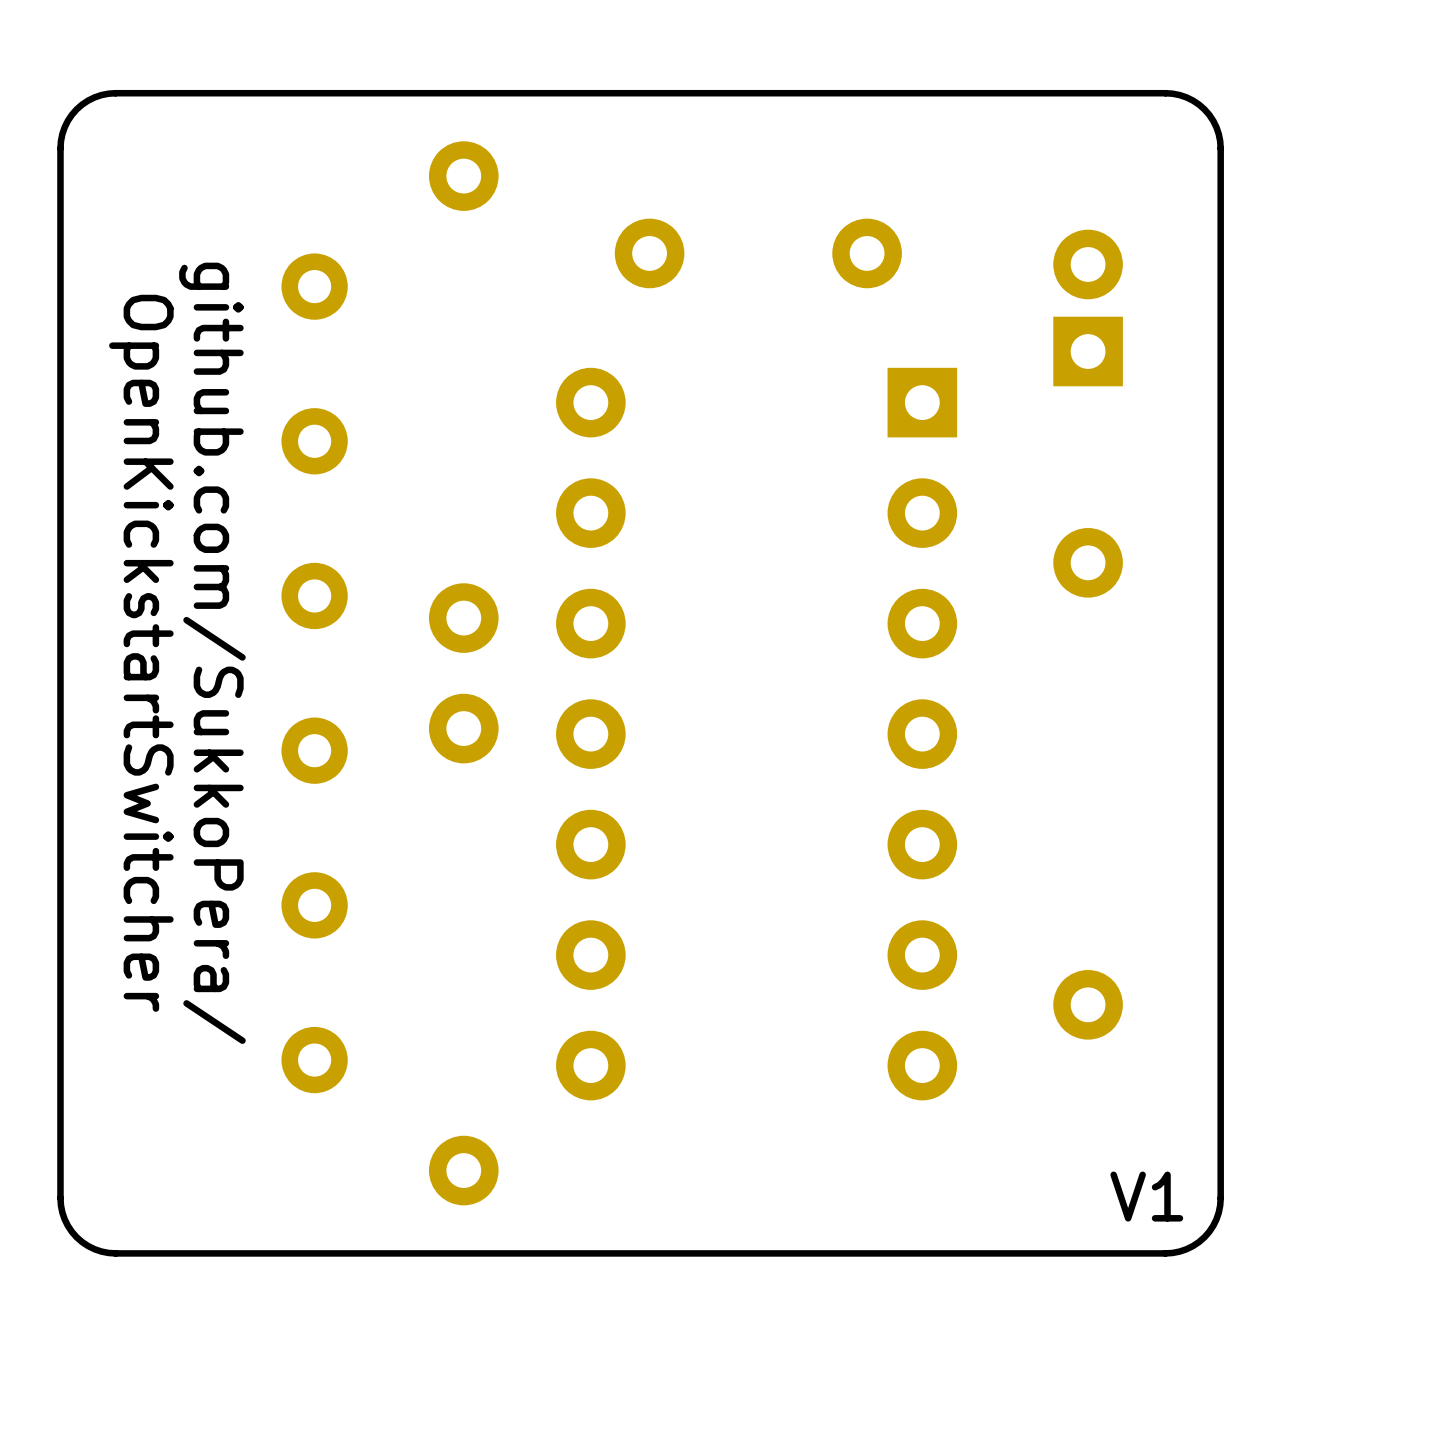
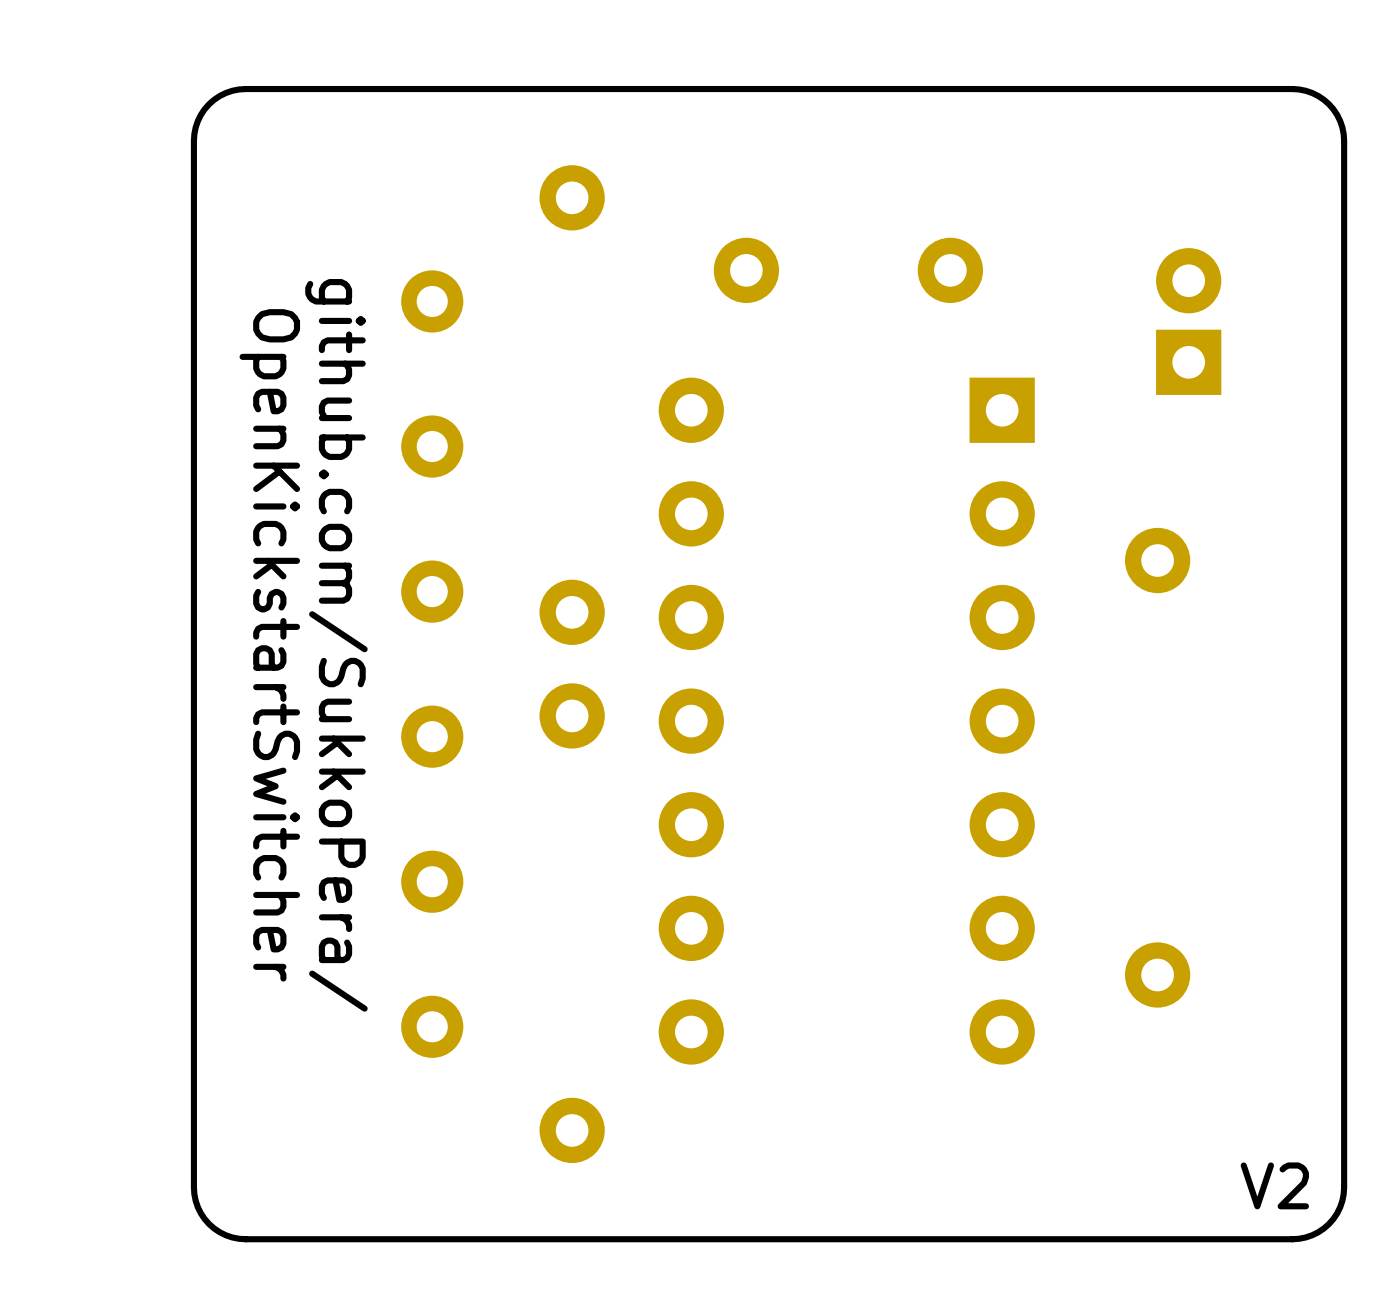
board edge: (60, 148) (64, 127) (76, 109) (94, 97) (115, 93) (1165, 93) (1186, 97) (1204, 109) (1216, 127) (1220, 148) (1220, 1198) (1216, 1219) (1204, 1237) (1186, 1249) (1165, 1253) (115, 1253) (94, 1249) (76, 1237) (64, 1219) (60, 1198) -> (193, 171) (194, 134) (200, 114) (209, 104) (219, 95) (232, 90) (245, 89) (1292, 89) (1312, 92) (1328, 104) (1340, 121) (1344, 140) (1344, 1187) (1340, 1207) (1328, 1224) (1312, 1235) (1292, 1239) (245, 1239) (232, 1237) (219, 1232) (209, 1224) (200, 1213) (194, 1194) (193, 1156)
part position: (1088, 307) -> (1188, 321)
text: V1 (1146, 1196) -> none
text: none -> V2 (1274, 1185)

